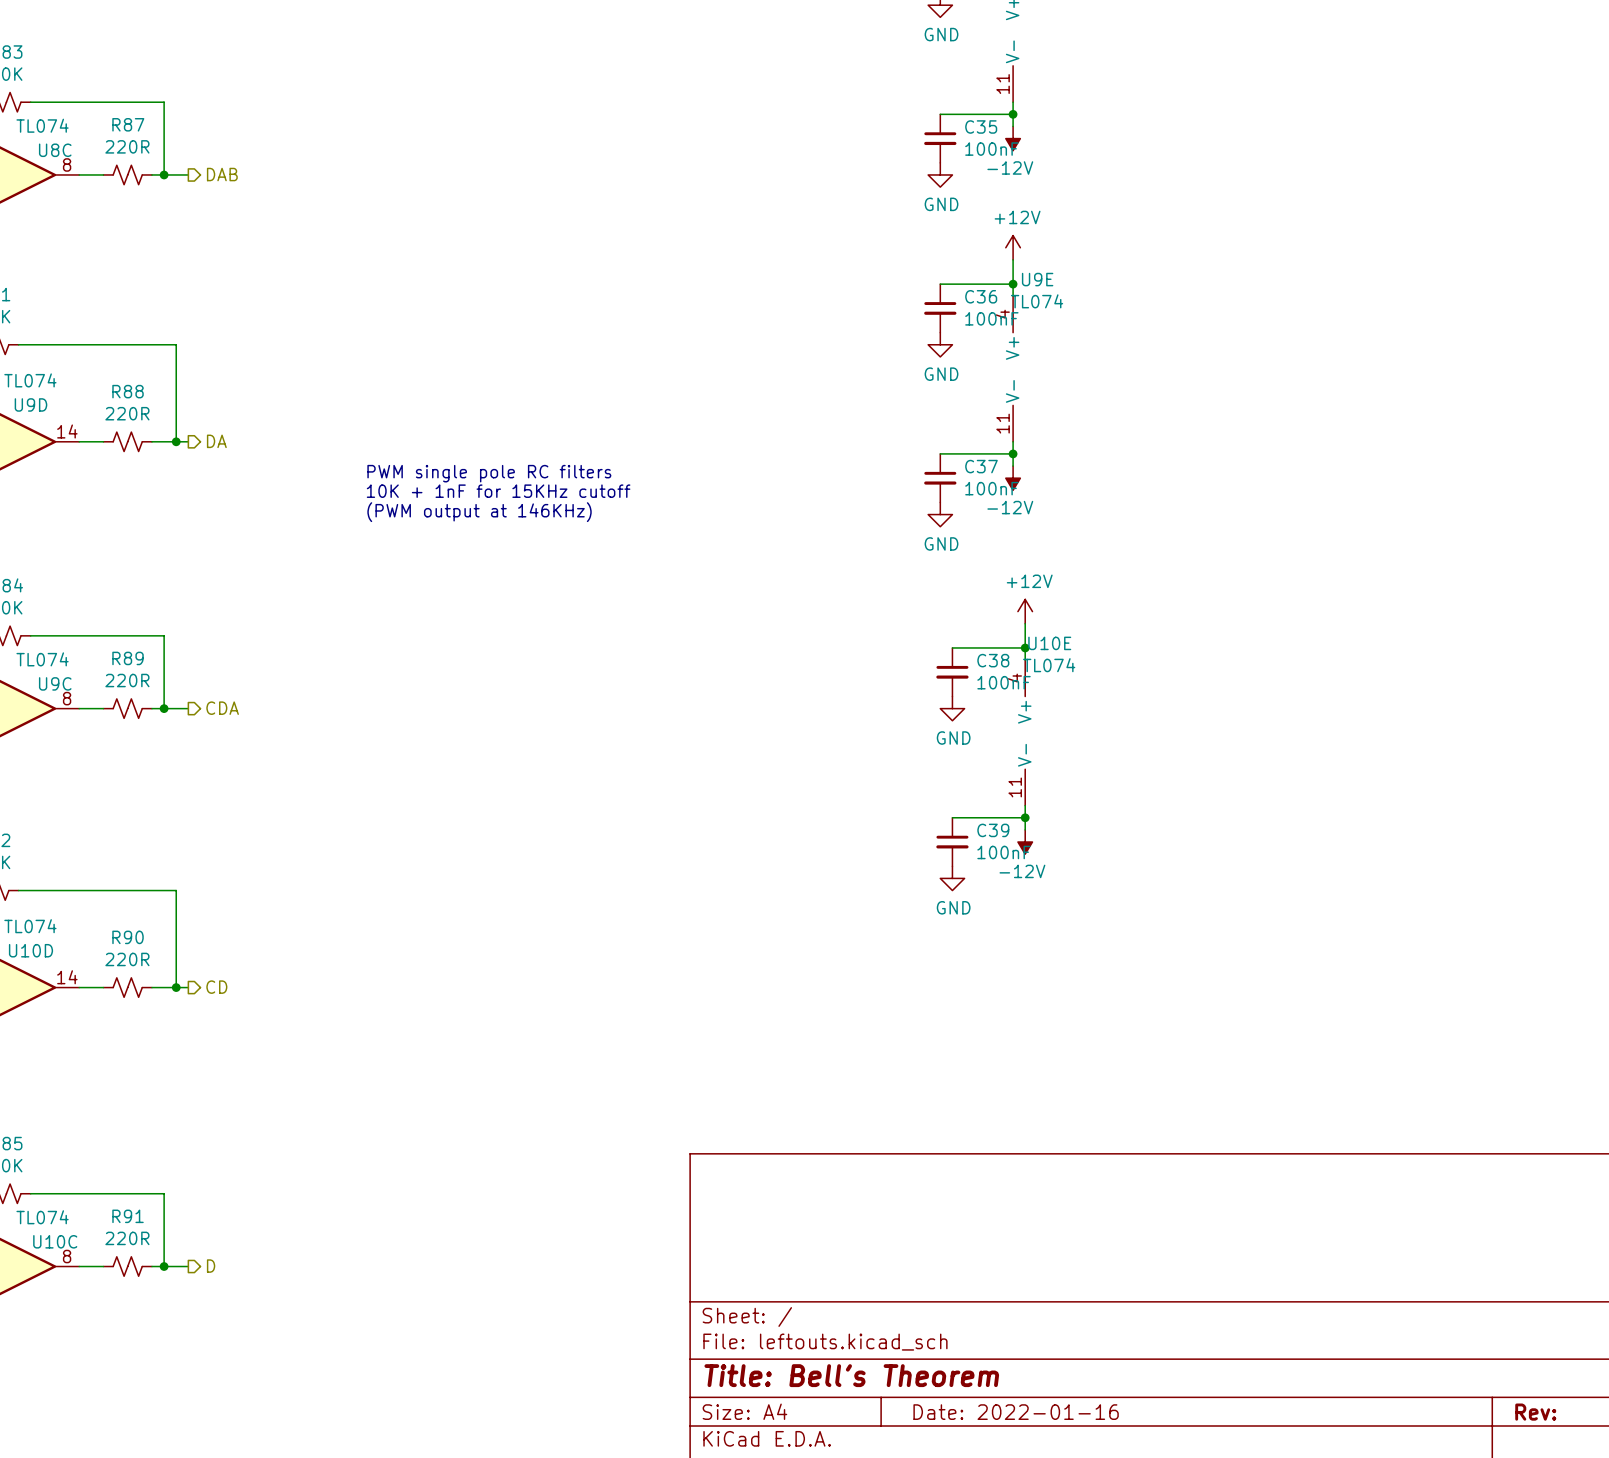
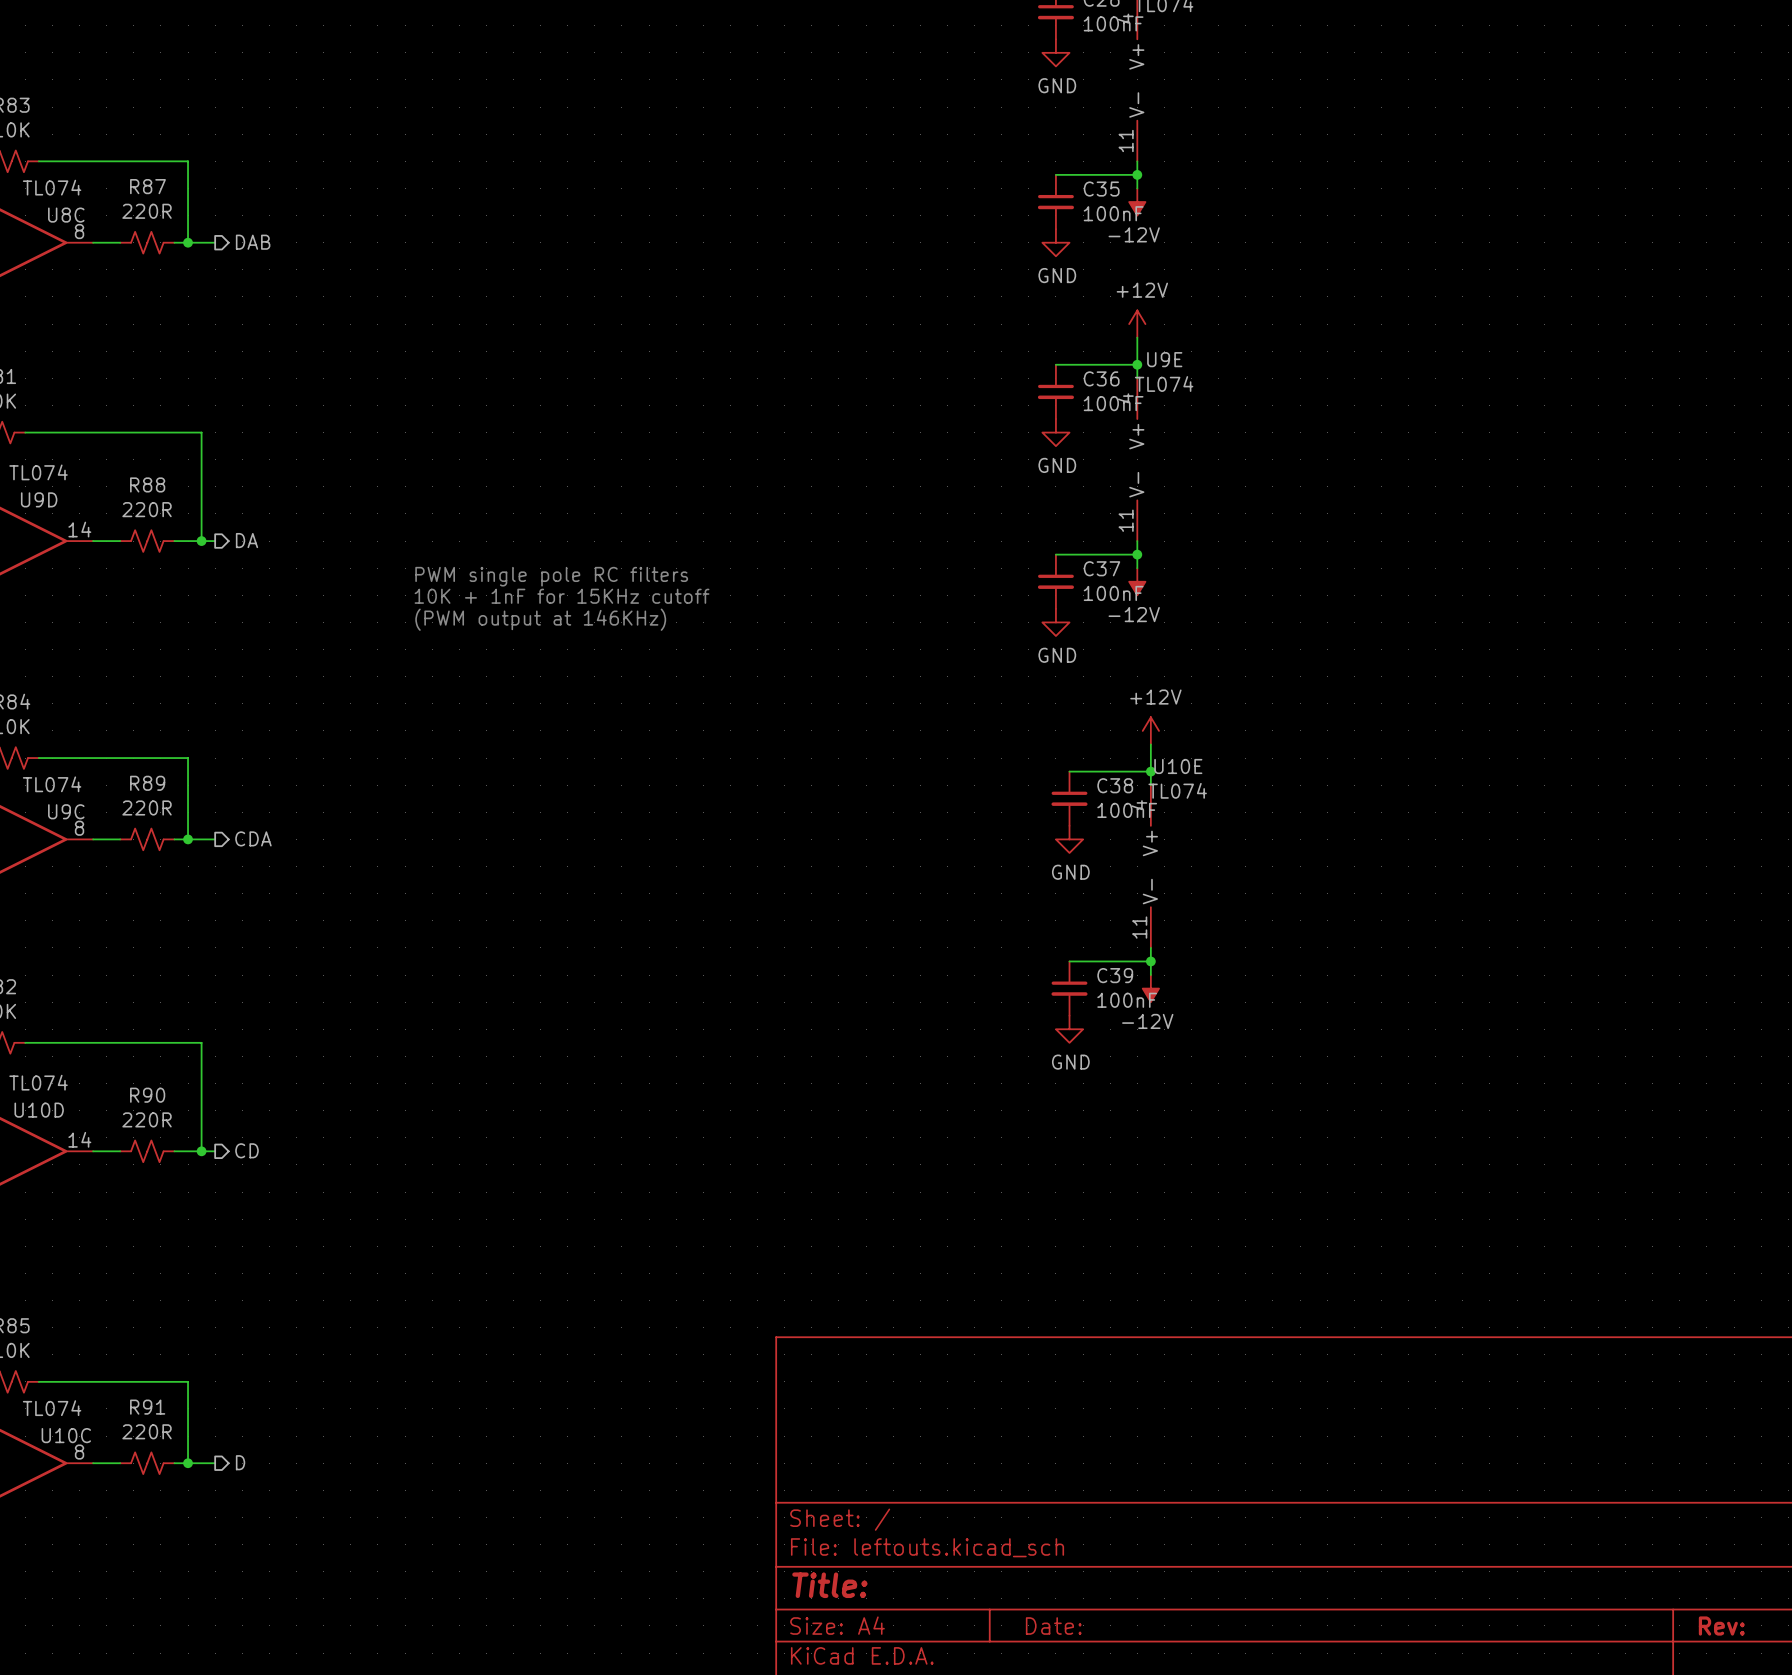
title block: Title: Bell's Theorem (851, 1375) -> Title: (829, 1585)
title block: Date: 2022-01-16 (1016, 1412) -> Date: (1053, 1626)

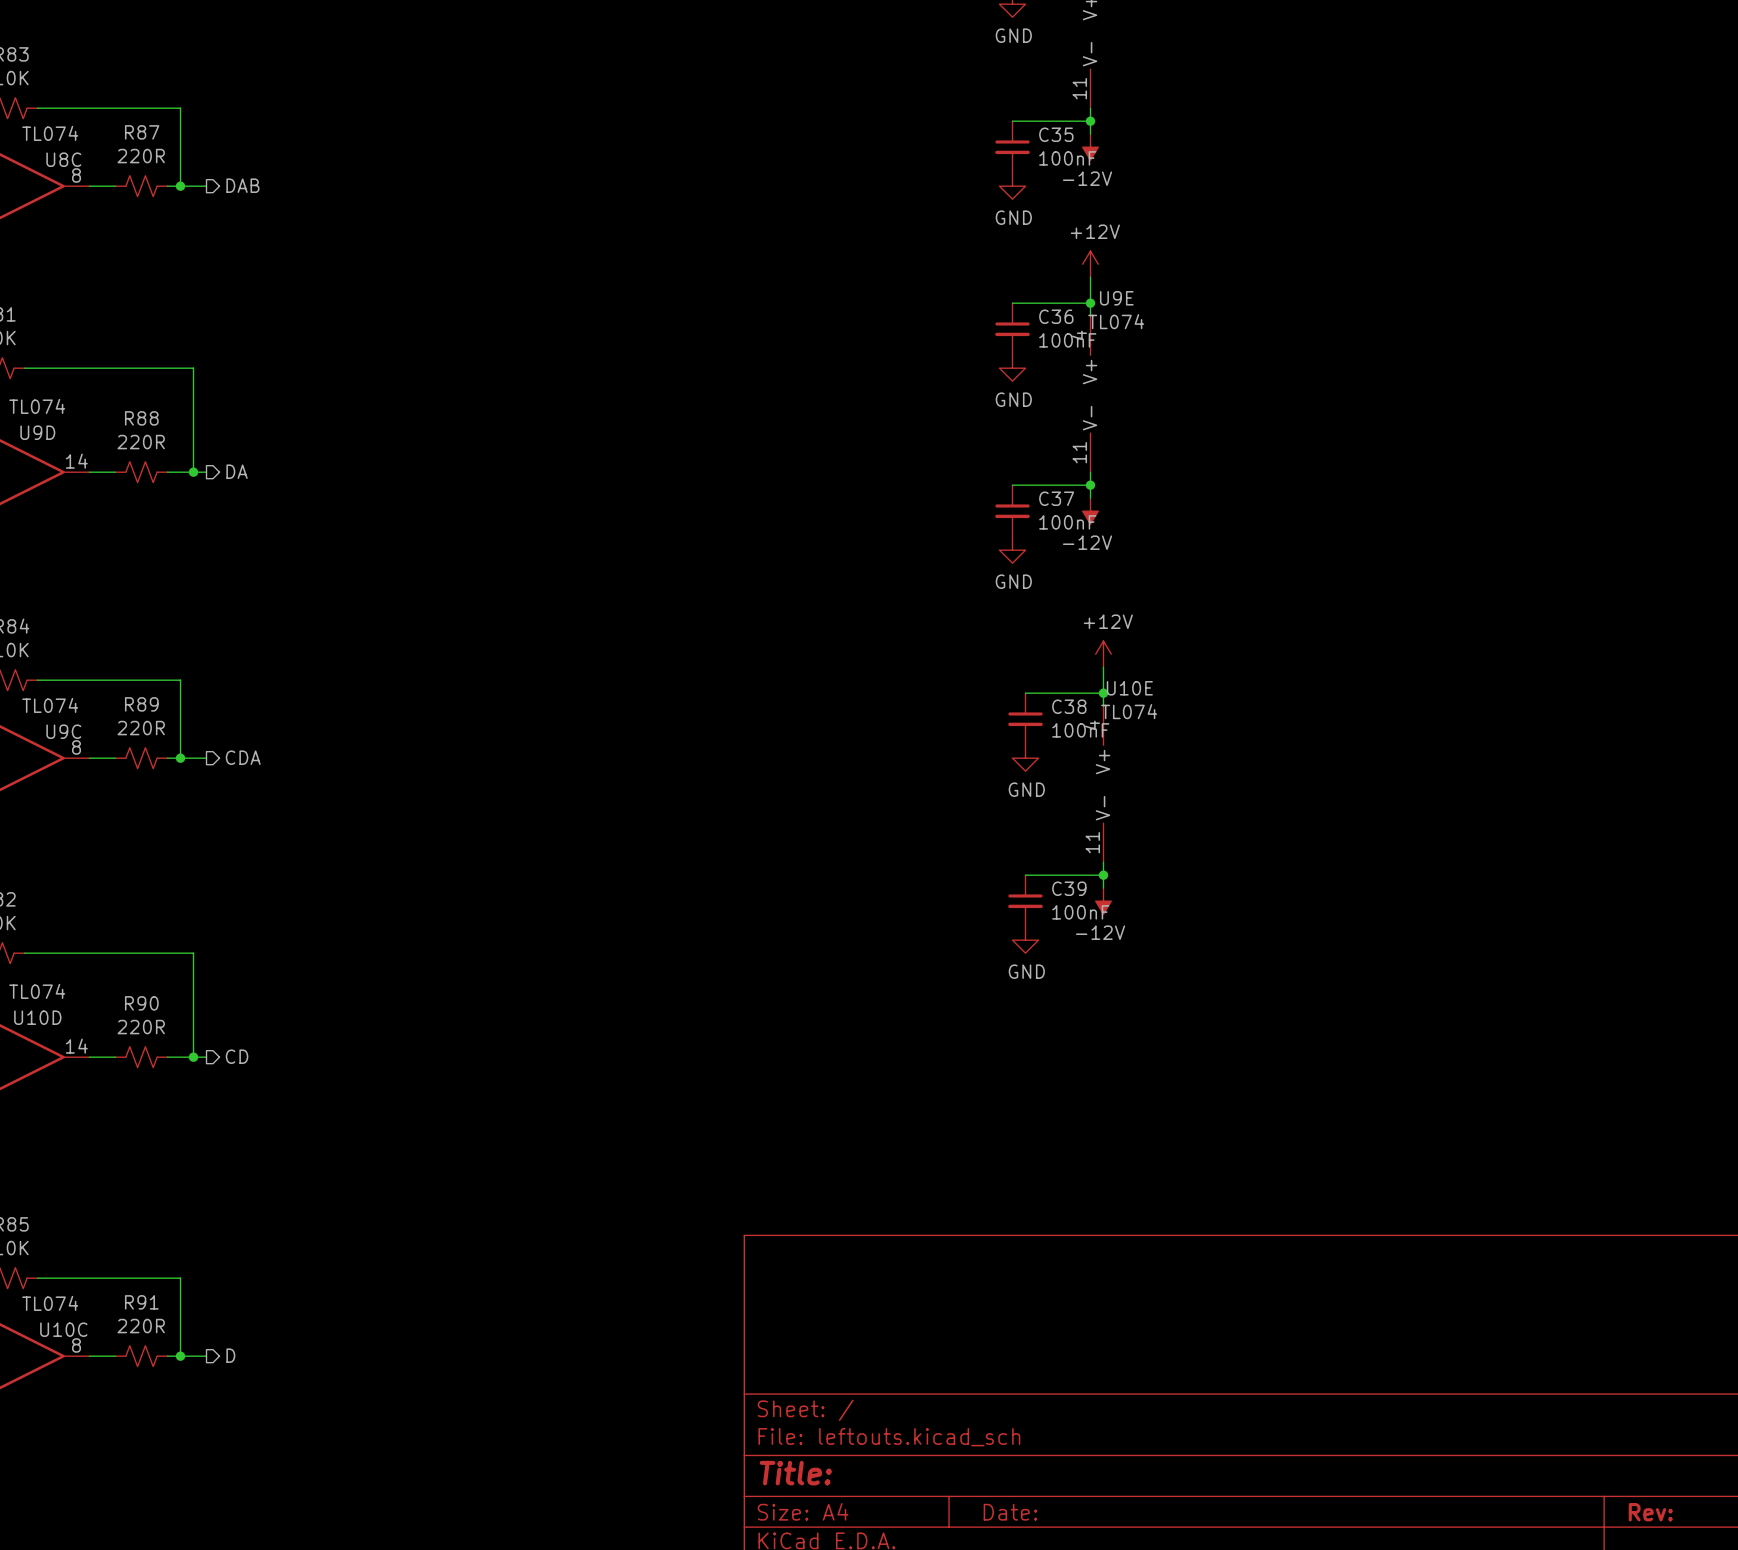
text: PWM single pole RC filters (551, 576) -> none
text: 10K + 1nF for 15KHz cutoff (562, 596) -> none
text: (PWM output at 146KHz) (540, 619) -> none

